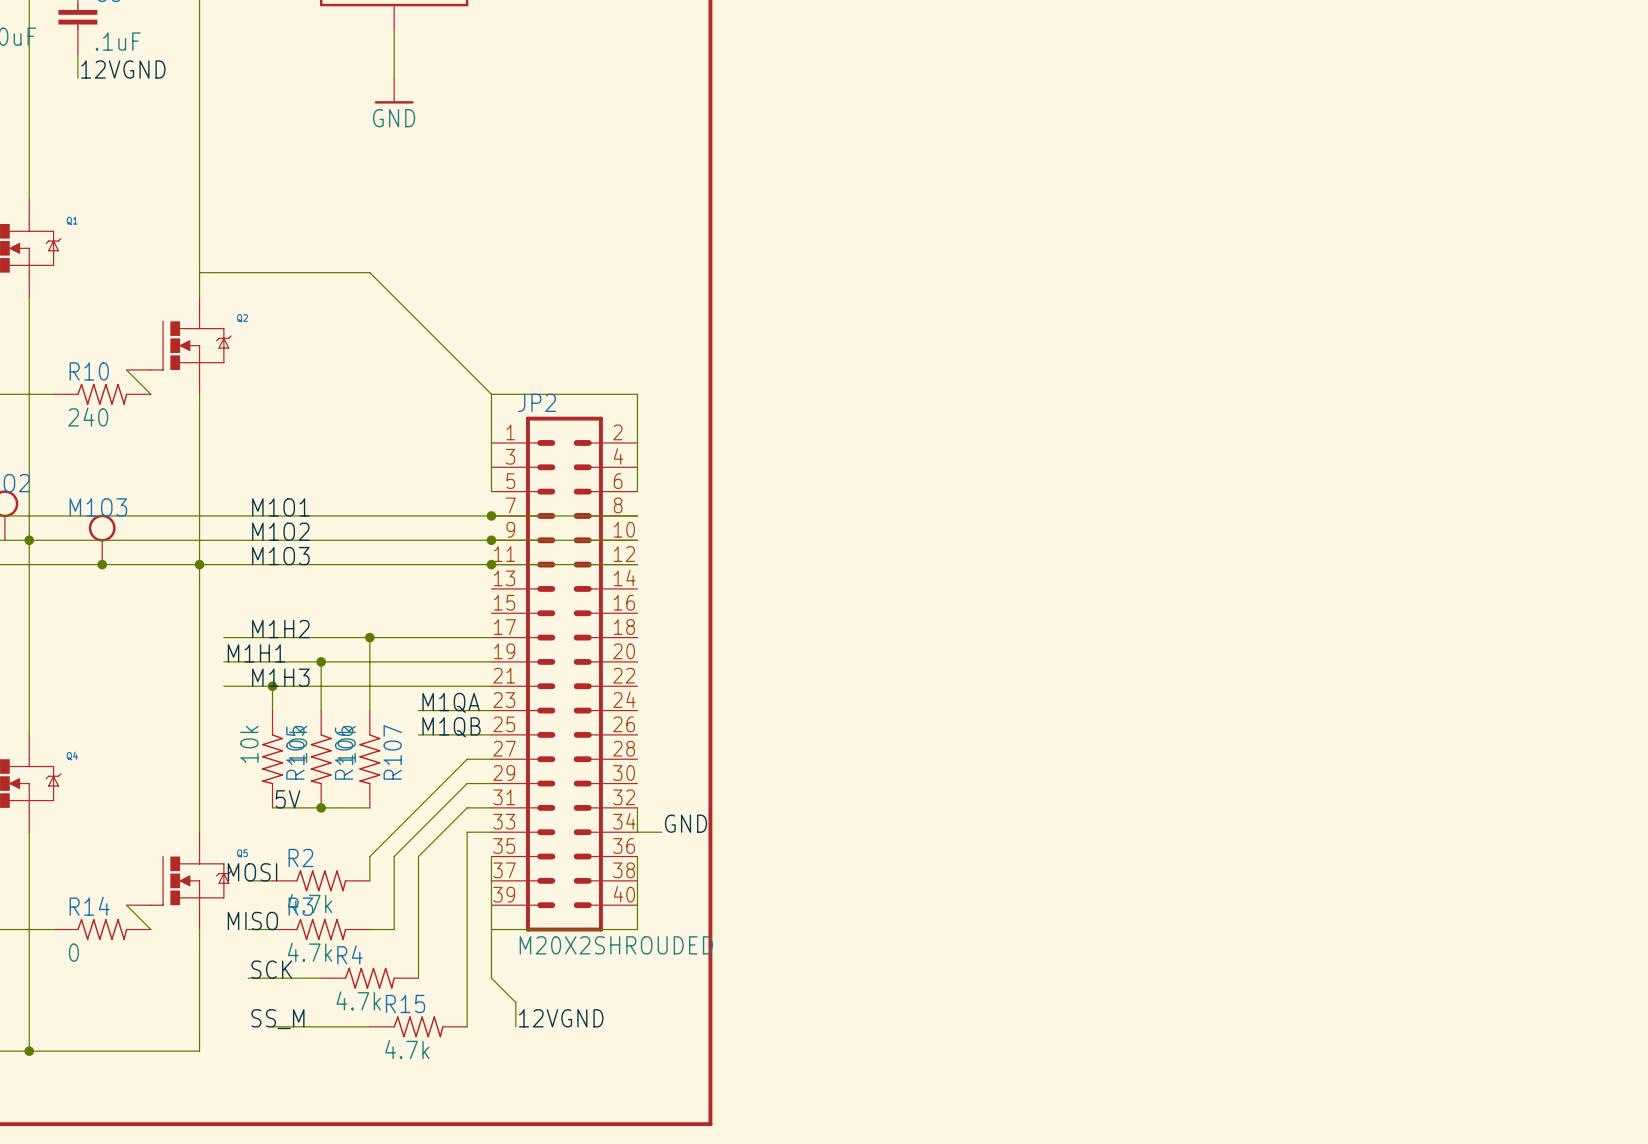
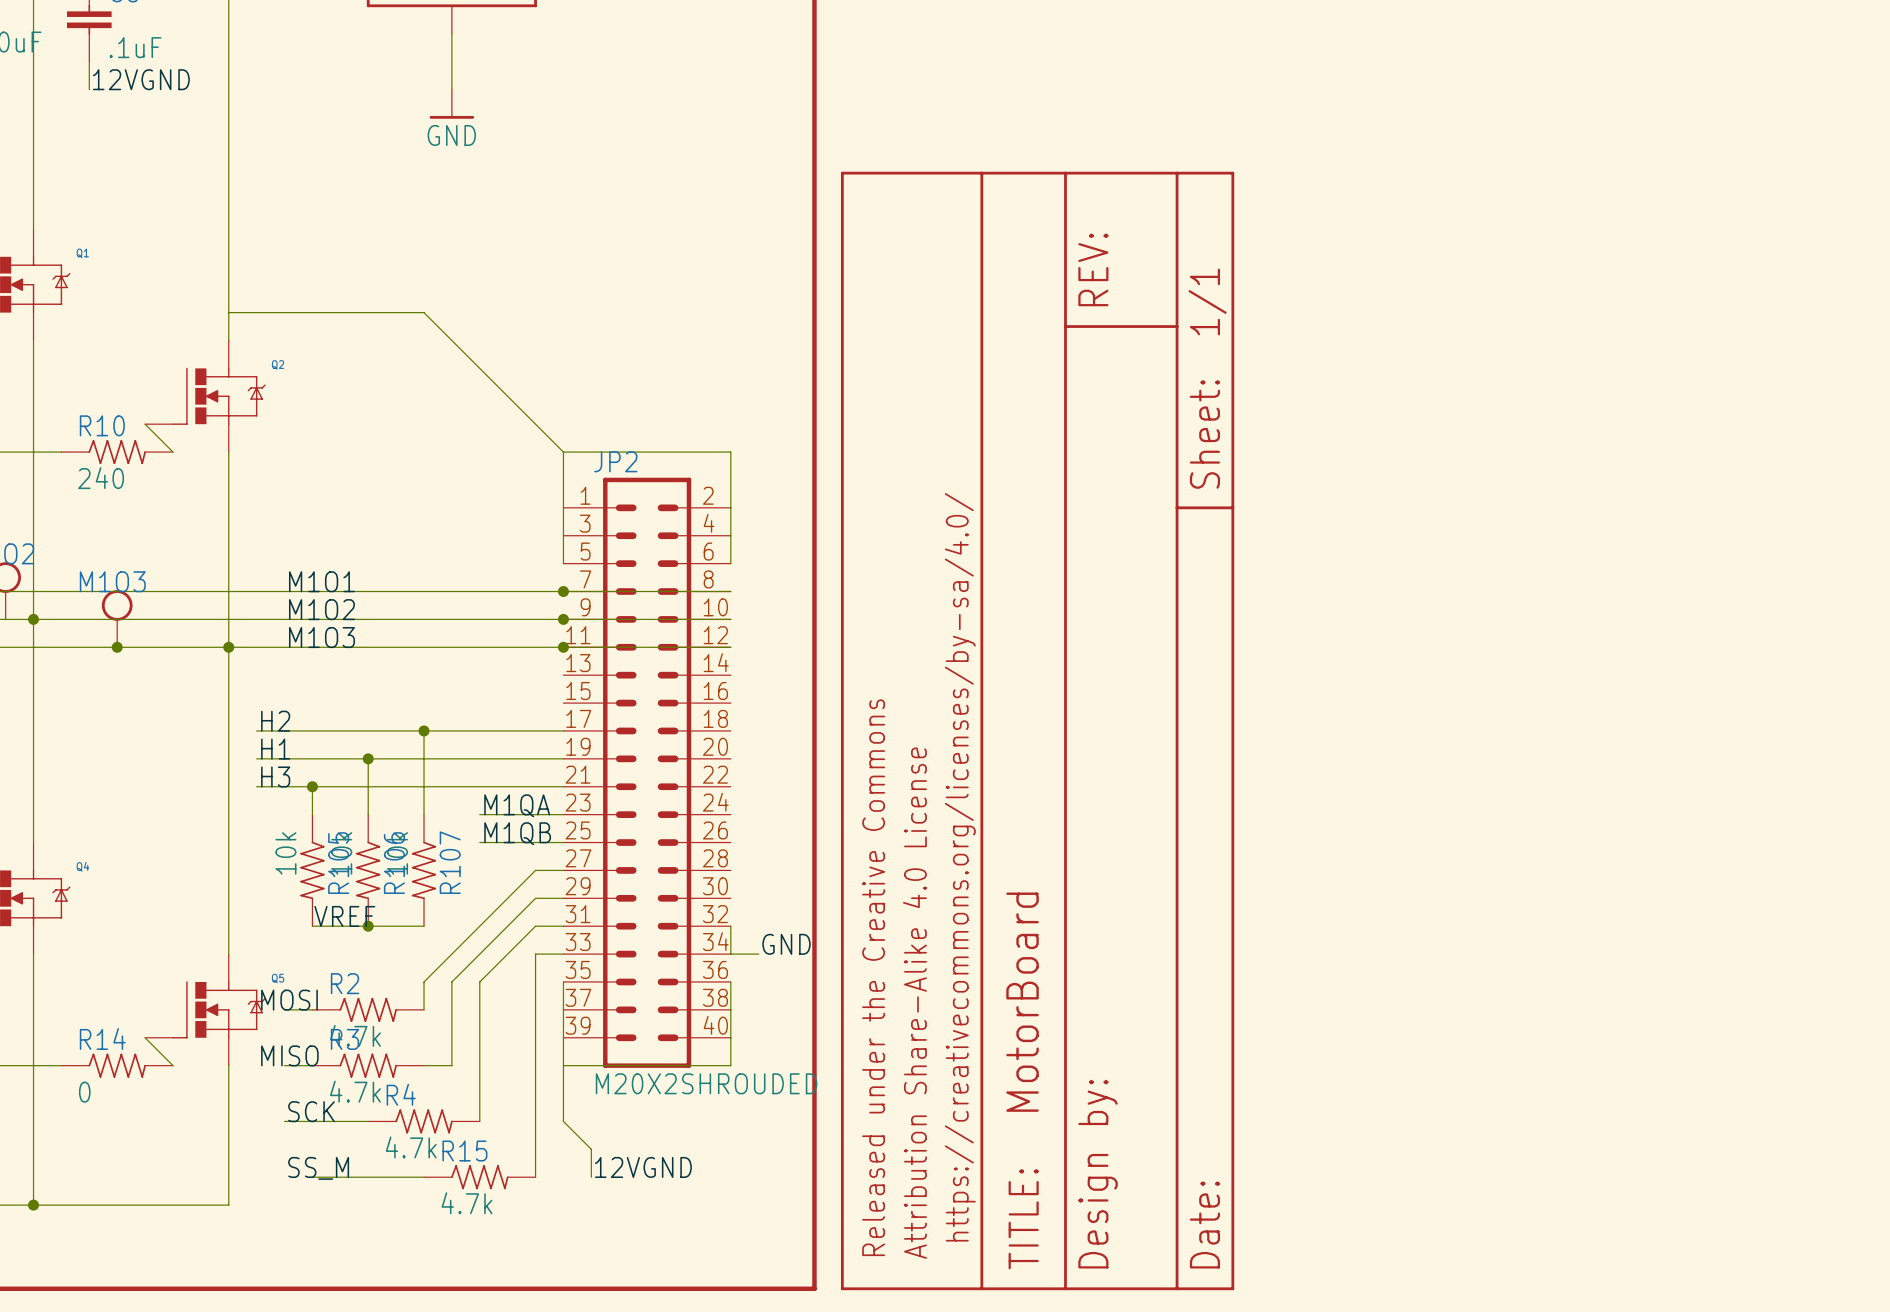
label: M1H2 (280, 629) -> H2 (275, 721)
part: none -> (1037, 730)
label: M1H1 (256, 653) -> H1 (275, 749)
label: M1H3 (280, 677) -> H3 (275, 776)
label: 5V (288, 799) -> VREF (344, 916)

